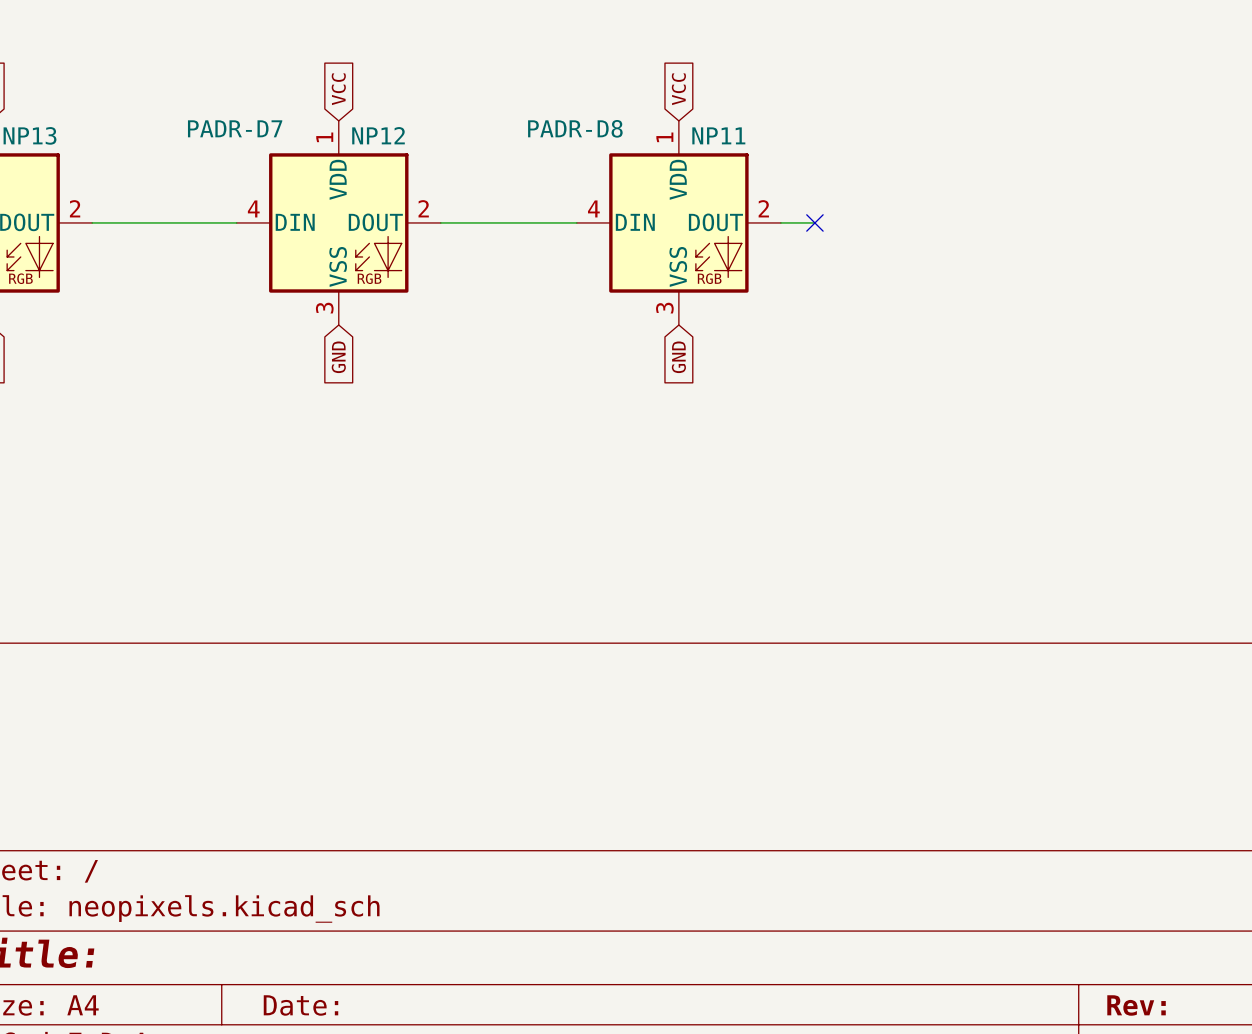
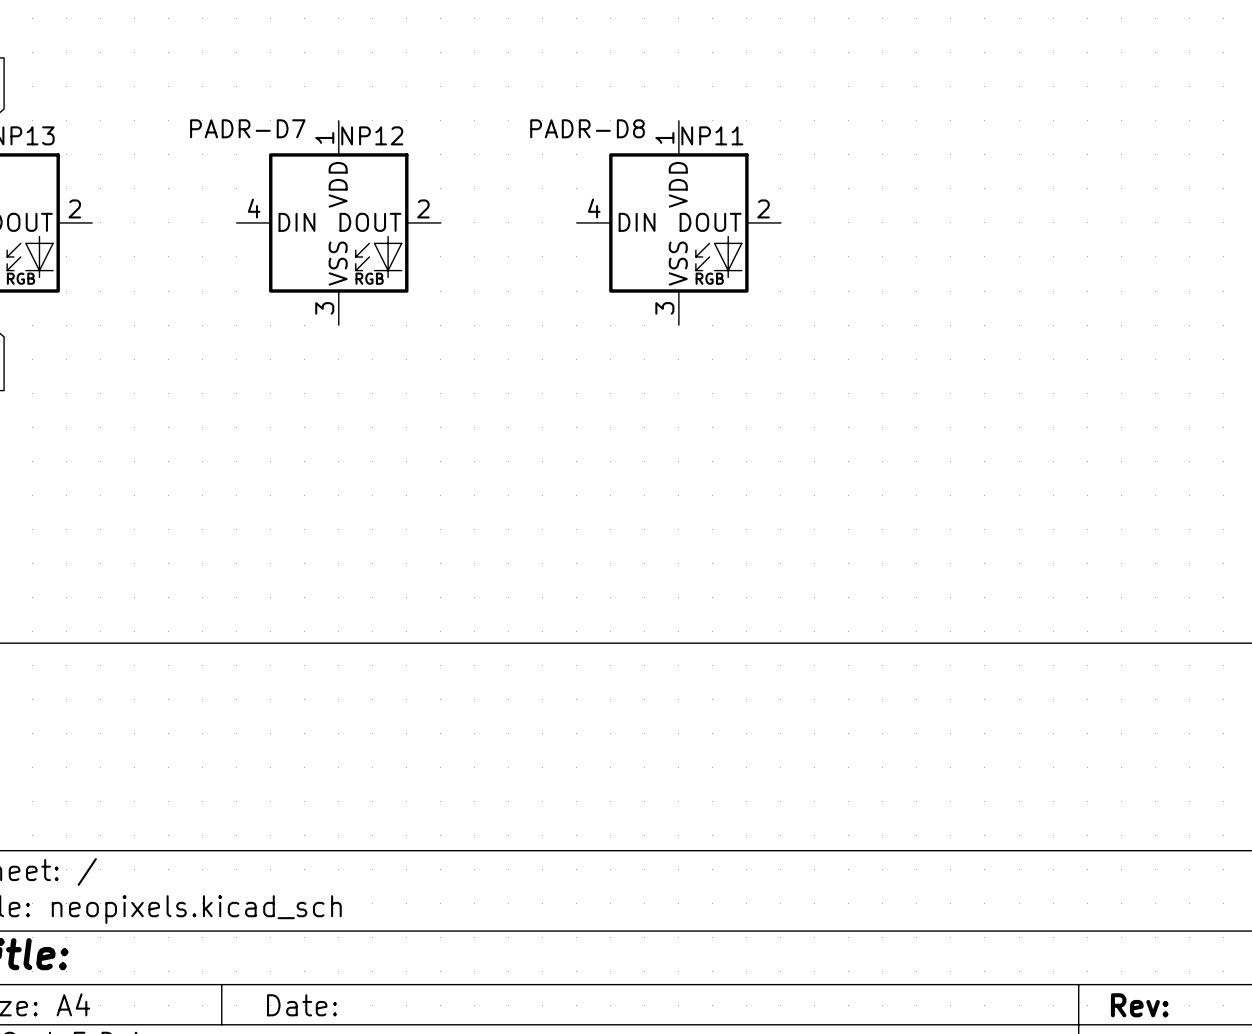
global label: VCC (338, 89) -> none
global label: VCC (678, 89) -> none
wire: (92, 222) (236, 222) -> none
wire: (440, 222) (576, 222) -> none
wire: (780, 222) (814, 222) -> none
no-connect mark: (814, 222) -> none
global label: GND (338, 357) -> none
global label: GND (678, 357) -> none

